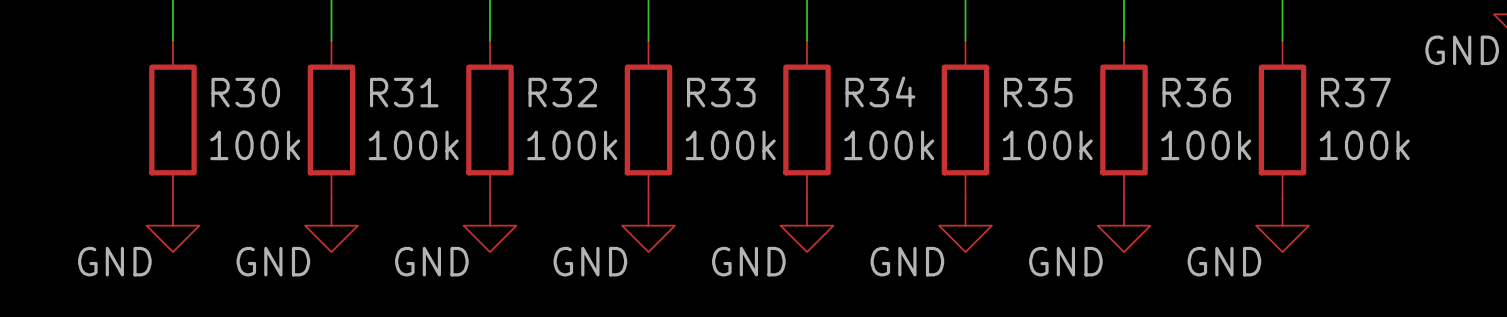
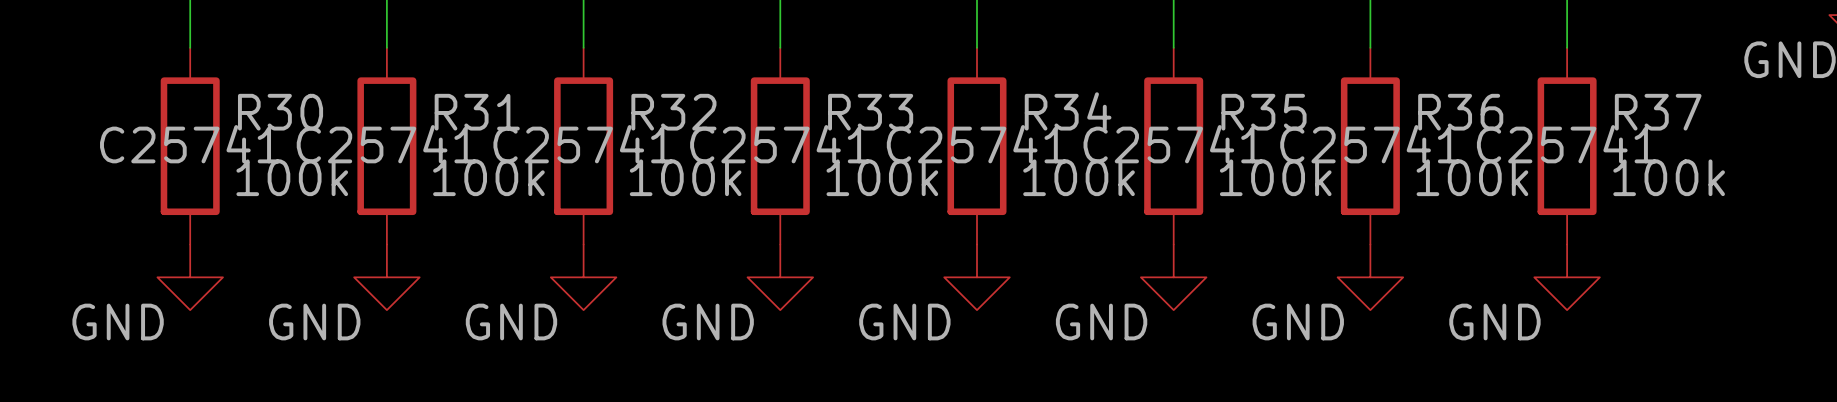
R30 text: none -> C25741 (190, 144)
R31 text: none -> C25741 (386, 144)
R32 text: none -> C25741 (583, 144)
R33 text: none -> C25741 (780, 144)
R34 text: none -> C25741 (976, 144)
R35 text: none -> C25741 (1173, 144)
R36 text: none -> C25741 (1370, 144)
R37 text: none -> C25741 (1567, 144)

